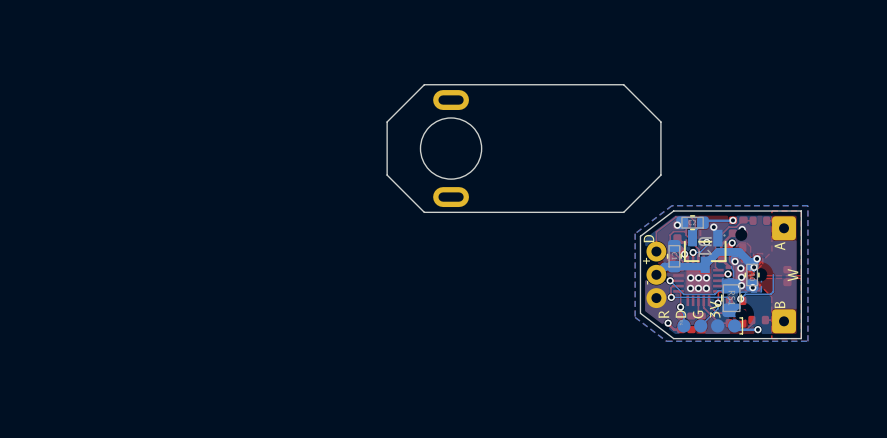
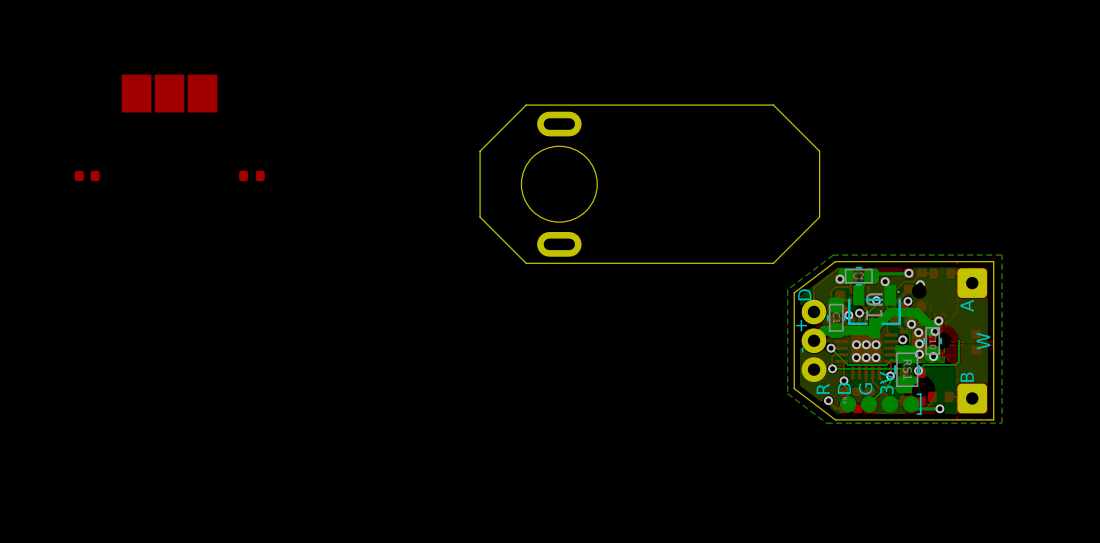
part: none -> (169, 93)
part: none -> (87, 175)
part: none -> (251, 175)

